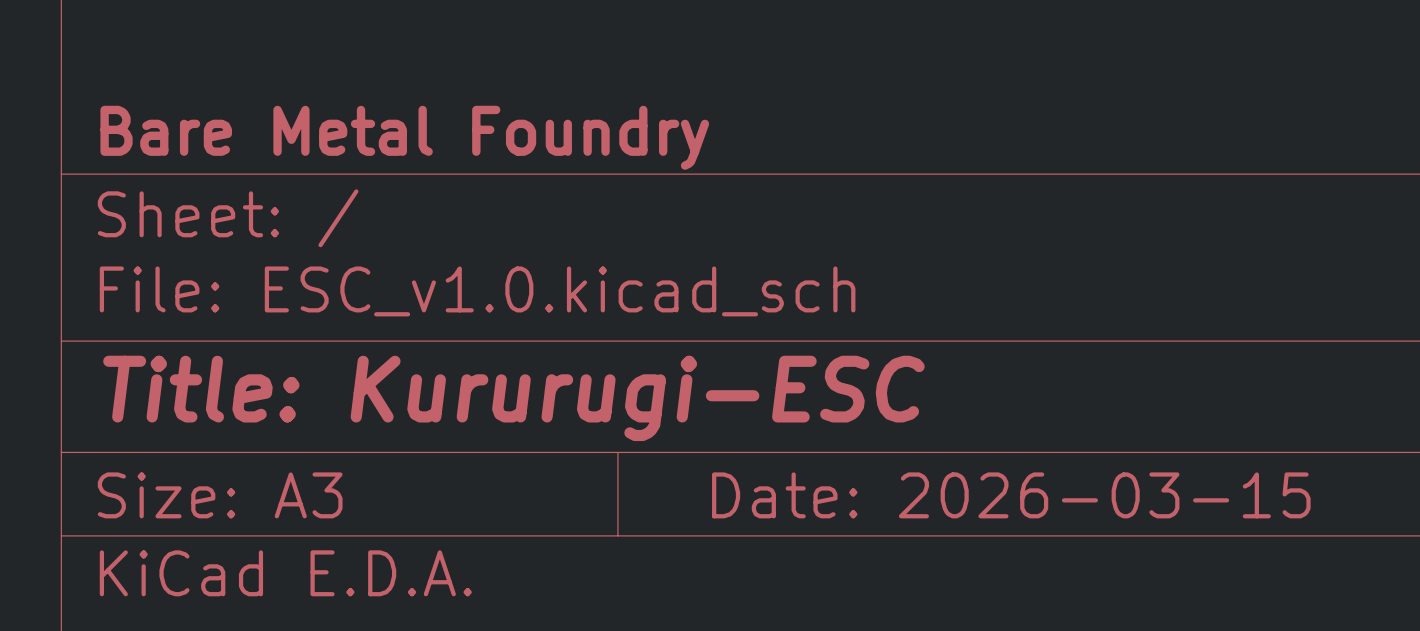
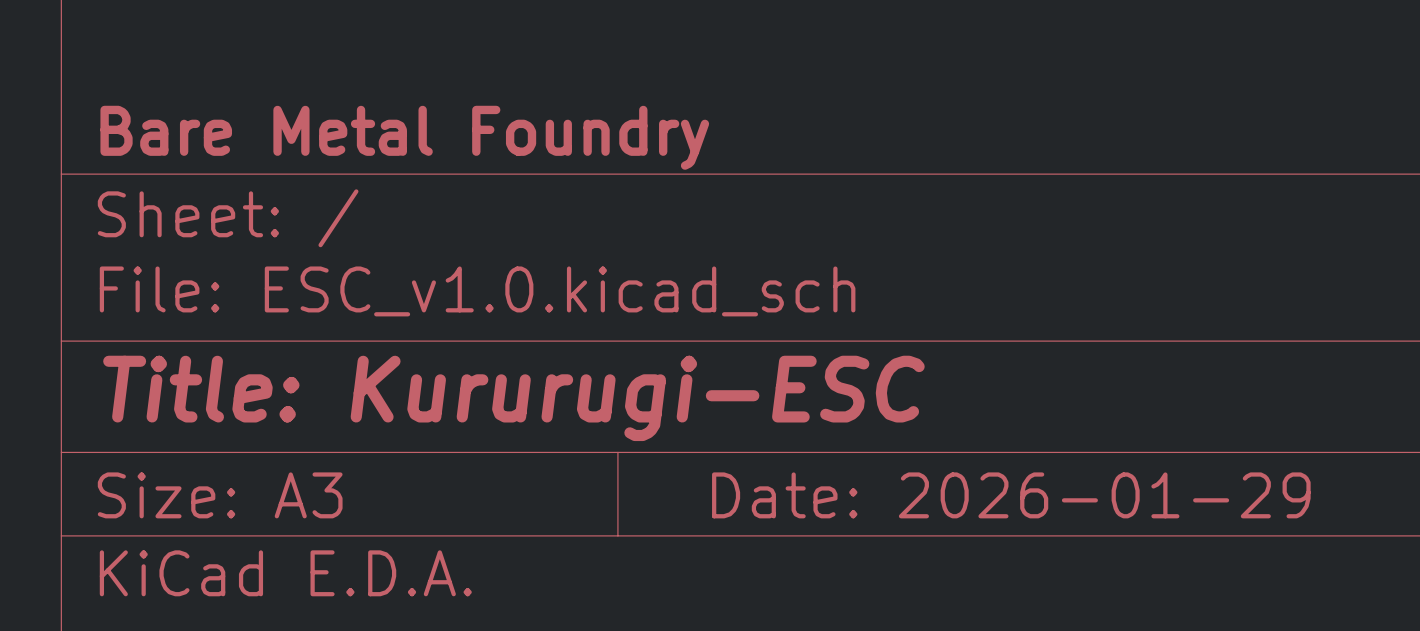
title block: Date: 2026-03-15 (1011, 495) -> Date: 2026-01-29 (1011, 495)

